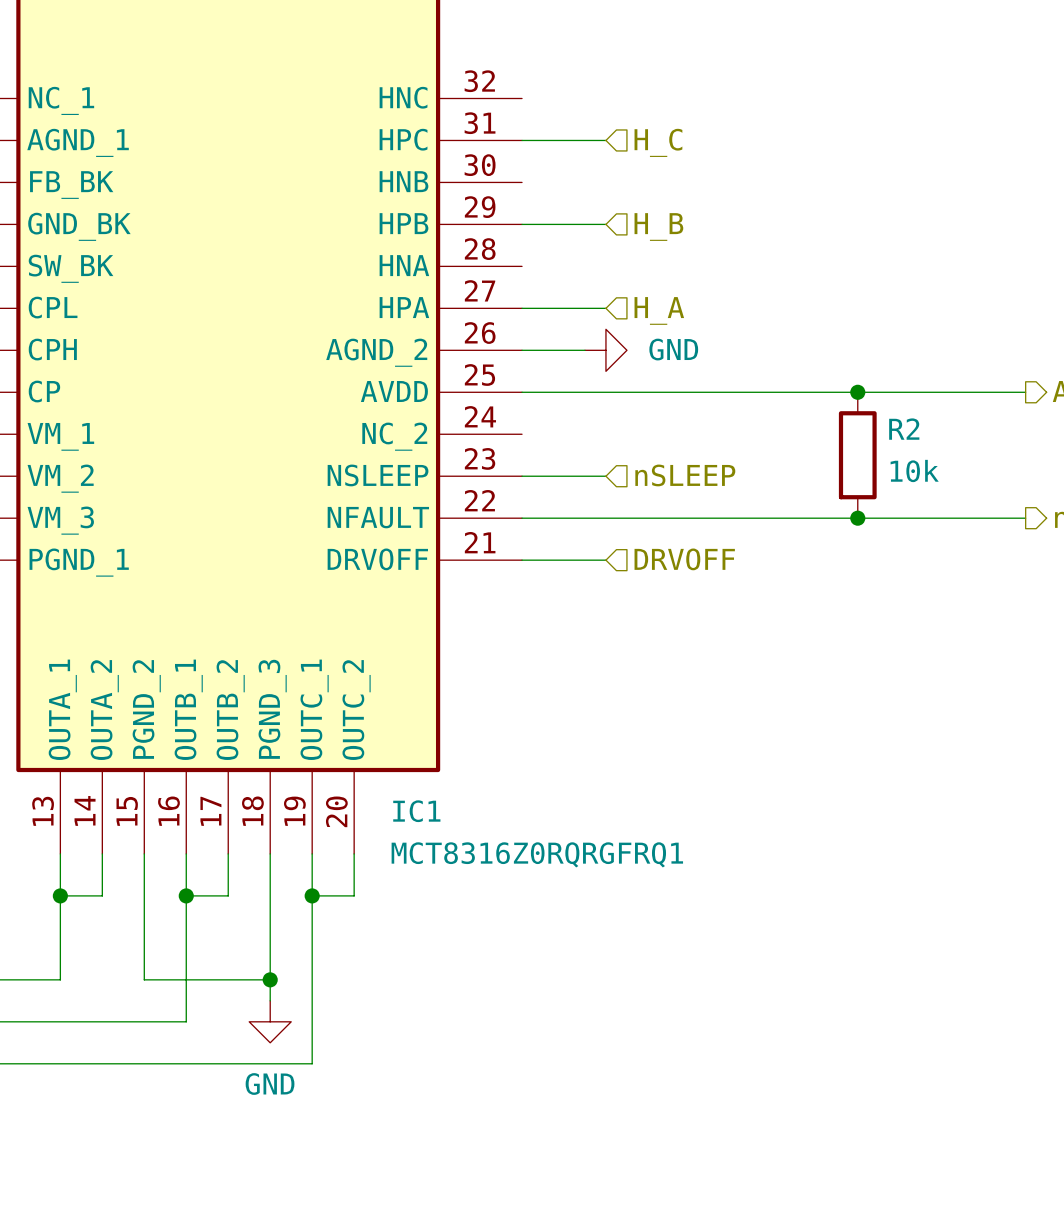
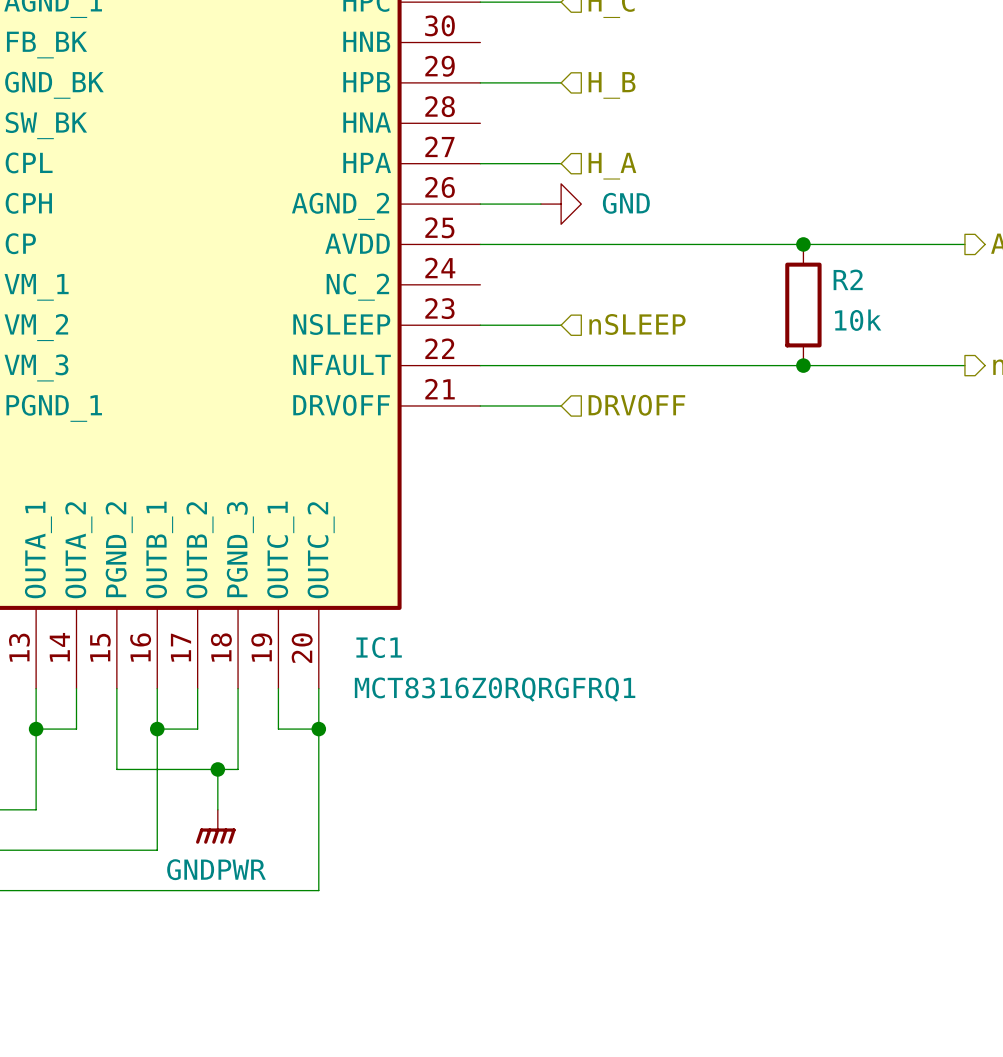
wire: (312, 895) (312, 1063) -> (318, 729) (318, 890) (278, 890)
junction: (312, 895) -> none
junction: none -> (318, 729)
wire: (144, 937) (144, 979) (270, 979) -> (116, 769) (238, 769)
wire: none -> (217, 769) (217, 809)
junction: none -> (217, 769)
wire: (270, 937) (270, 1000) -> none
junction: (270, 979) -> none
power symbol: none -> GNDPWR (215, 826)
power symbol: GND (270, 1021) -> none

